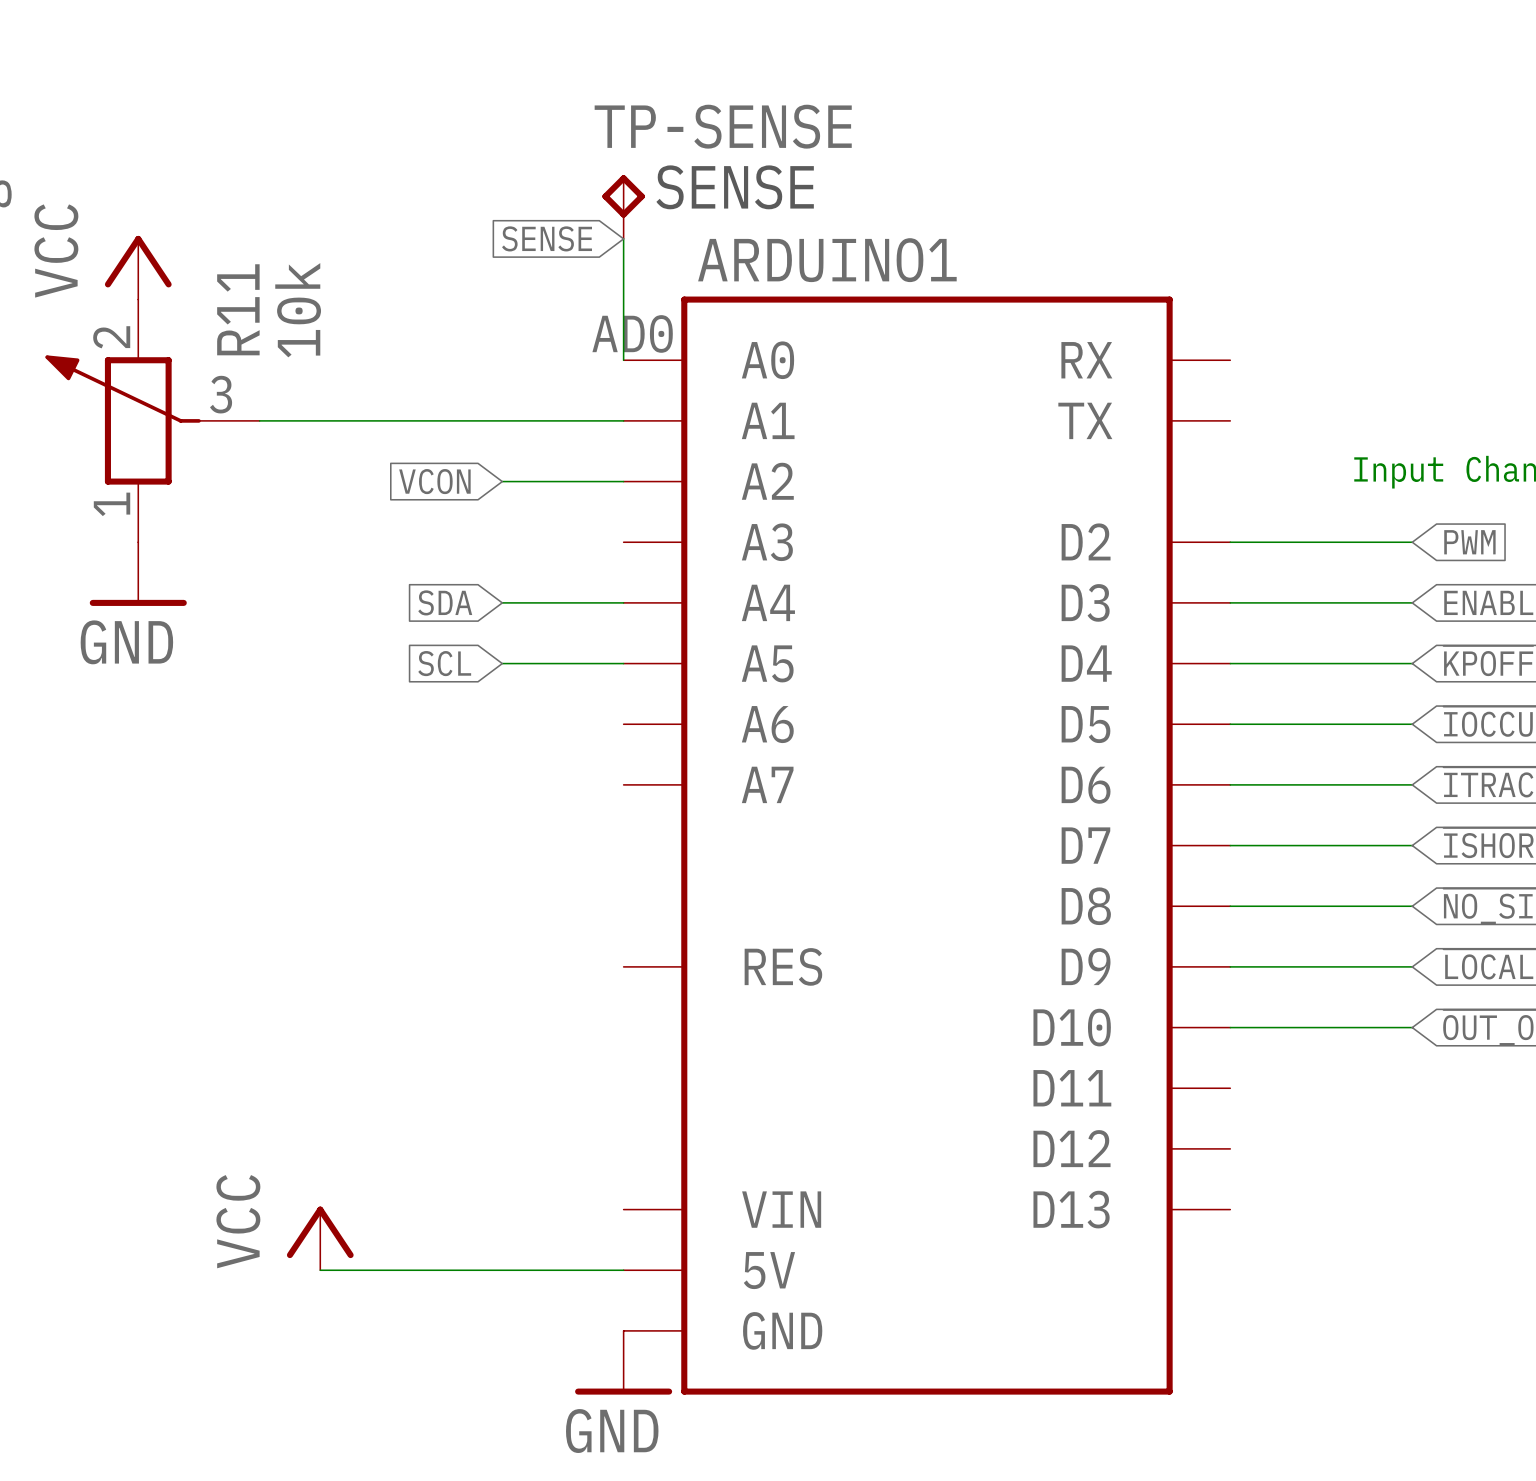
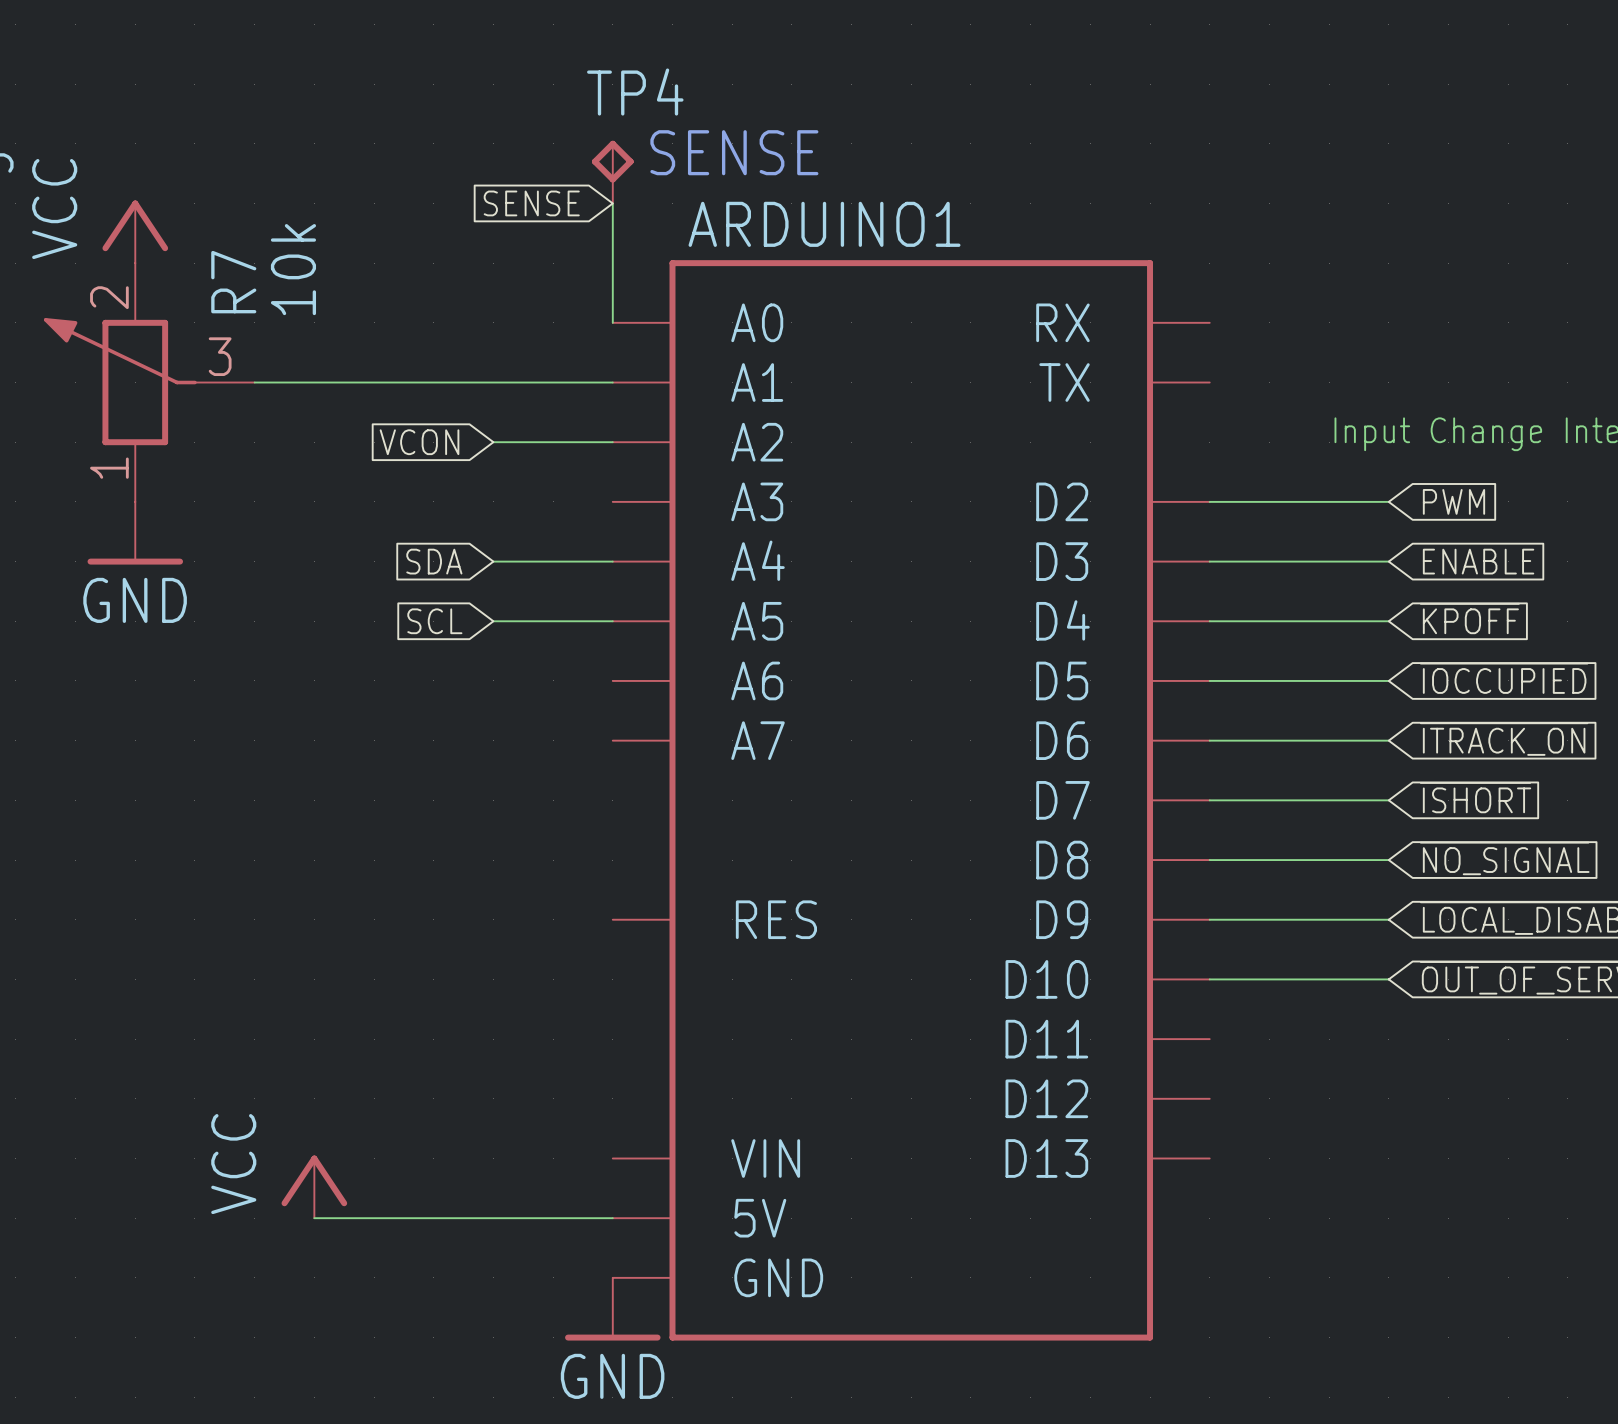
TP-SENSE name: TP-SENSE (723, 126) -> TP4 (635, 92)
R11 name: R11 (238, 309) -> R7 (233, 282)
ARDUINO1 pin number: AD0 (632, 333) -> none

